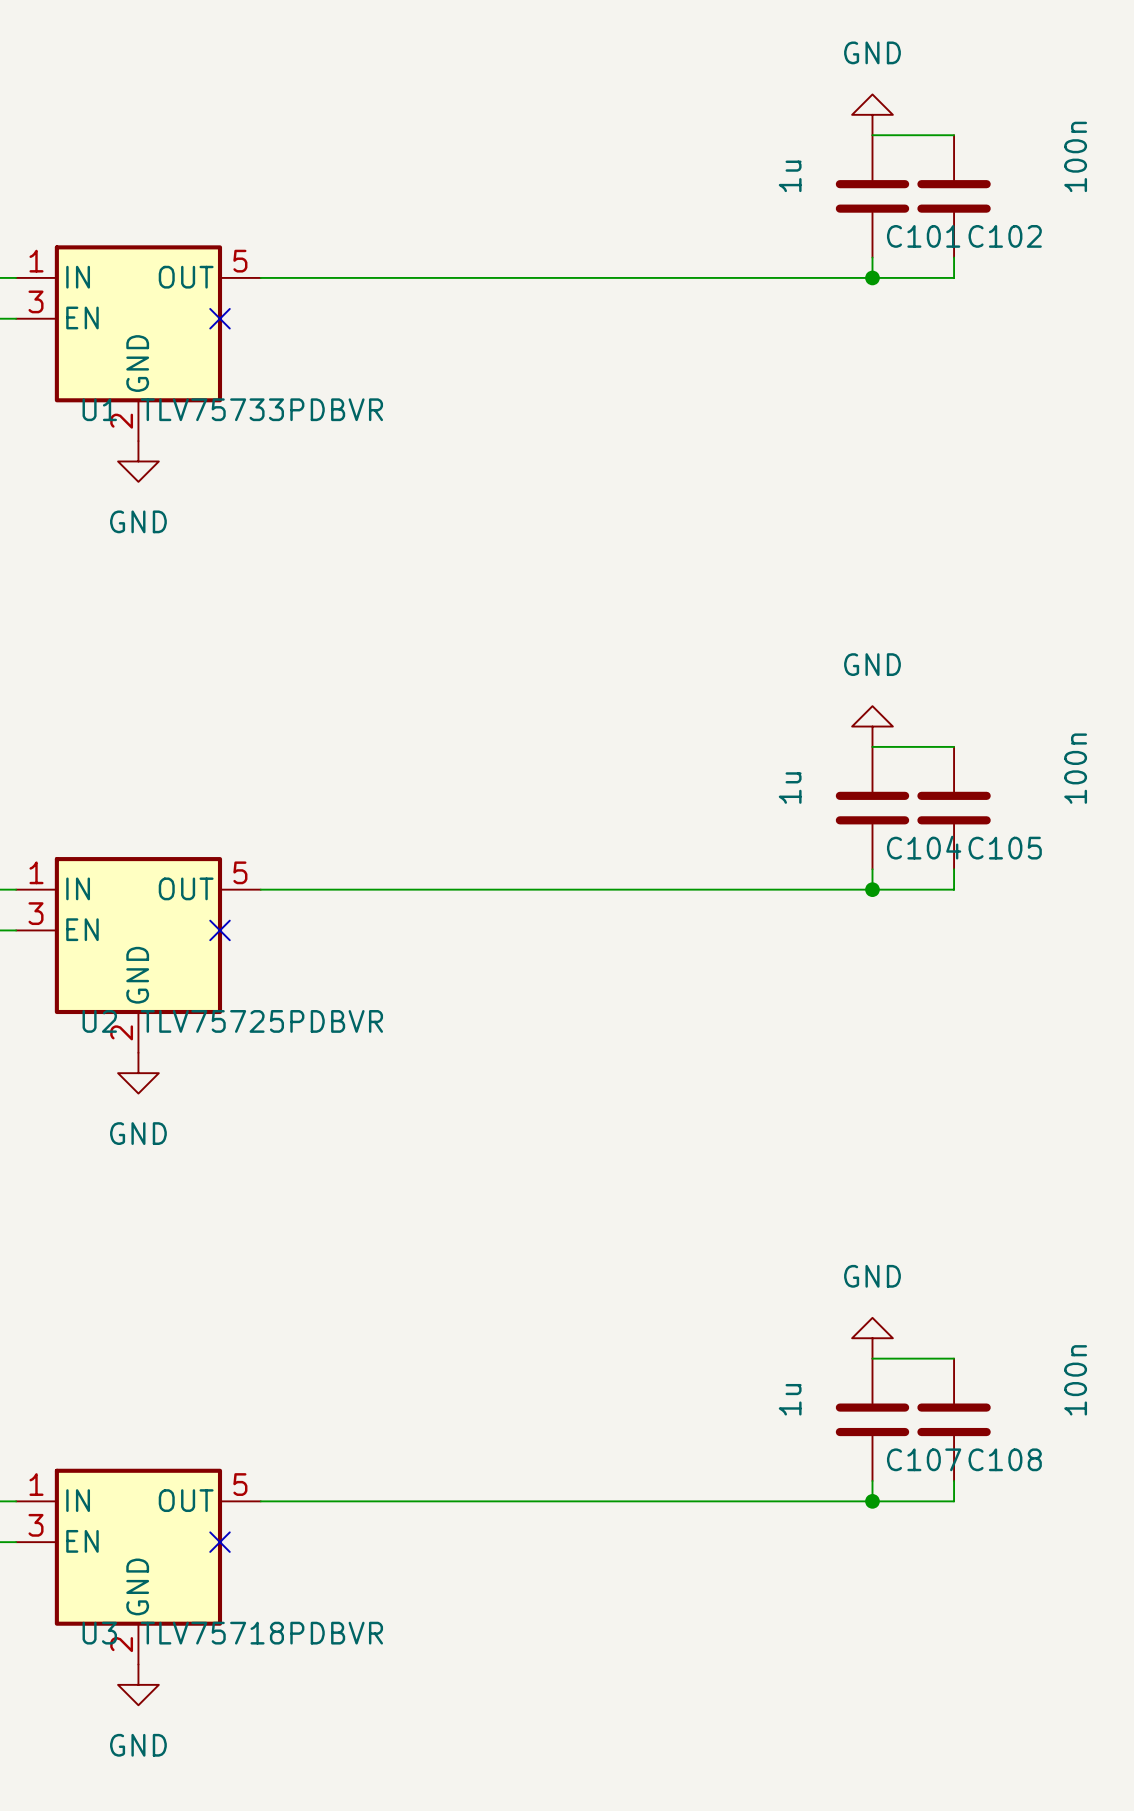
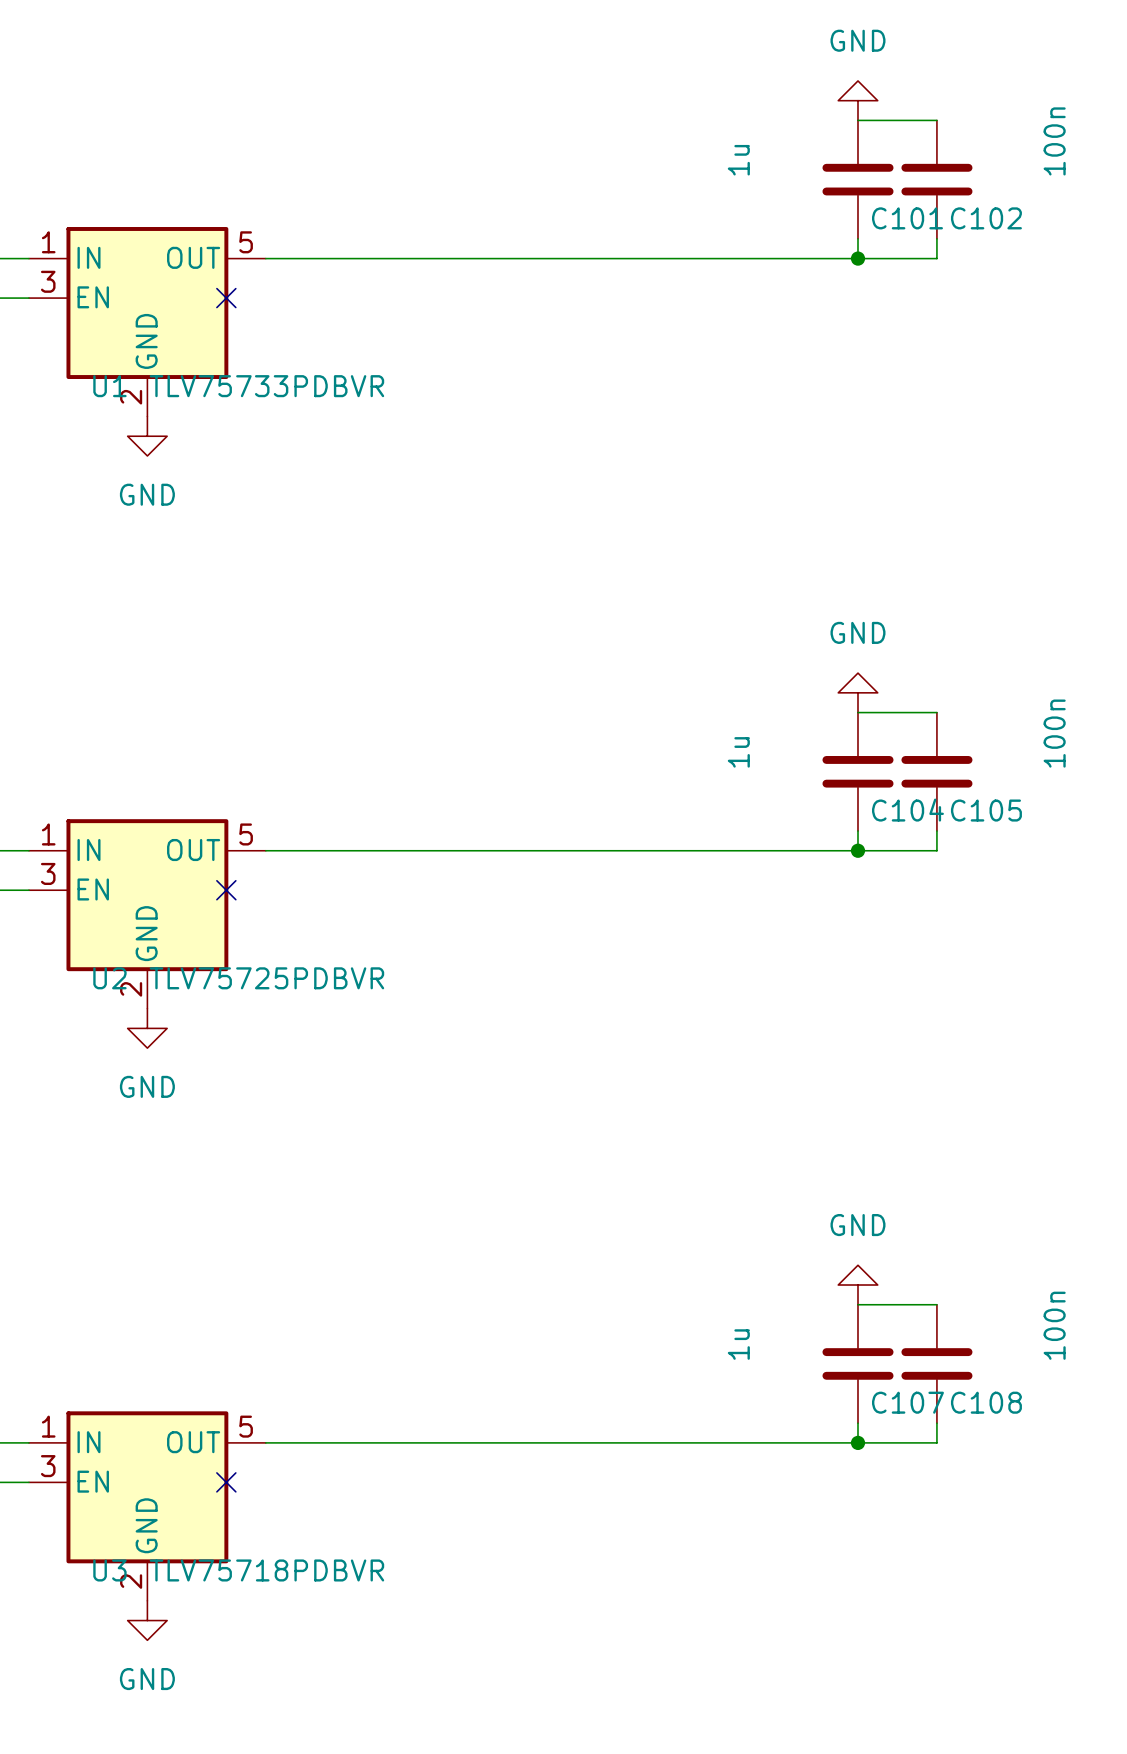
C101 value position: 1u (790, 176) -> 1u (738, 160)
C104 value position: 1u (790, 788) -> 1u (738, 752)
C107 value position: 1u (790, 1399) -> 1u (738, 1344)

